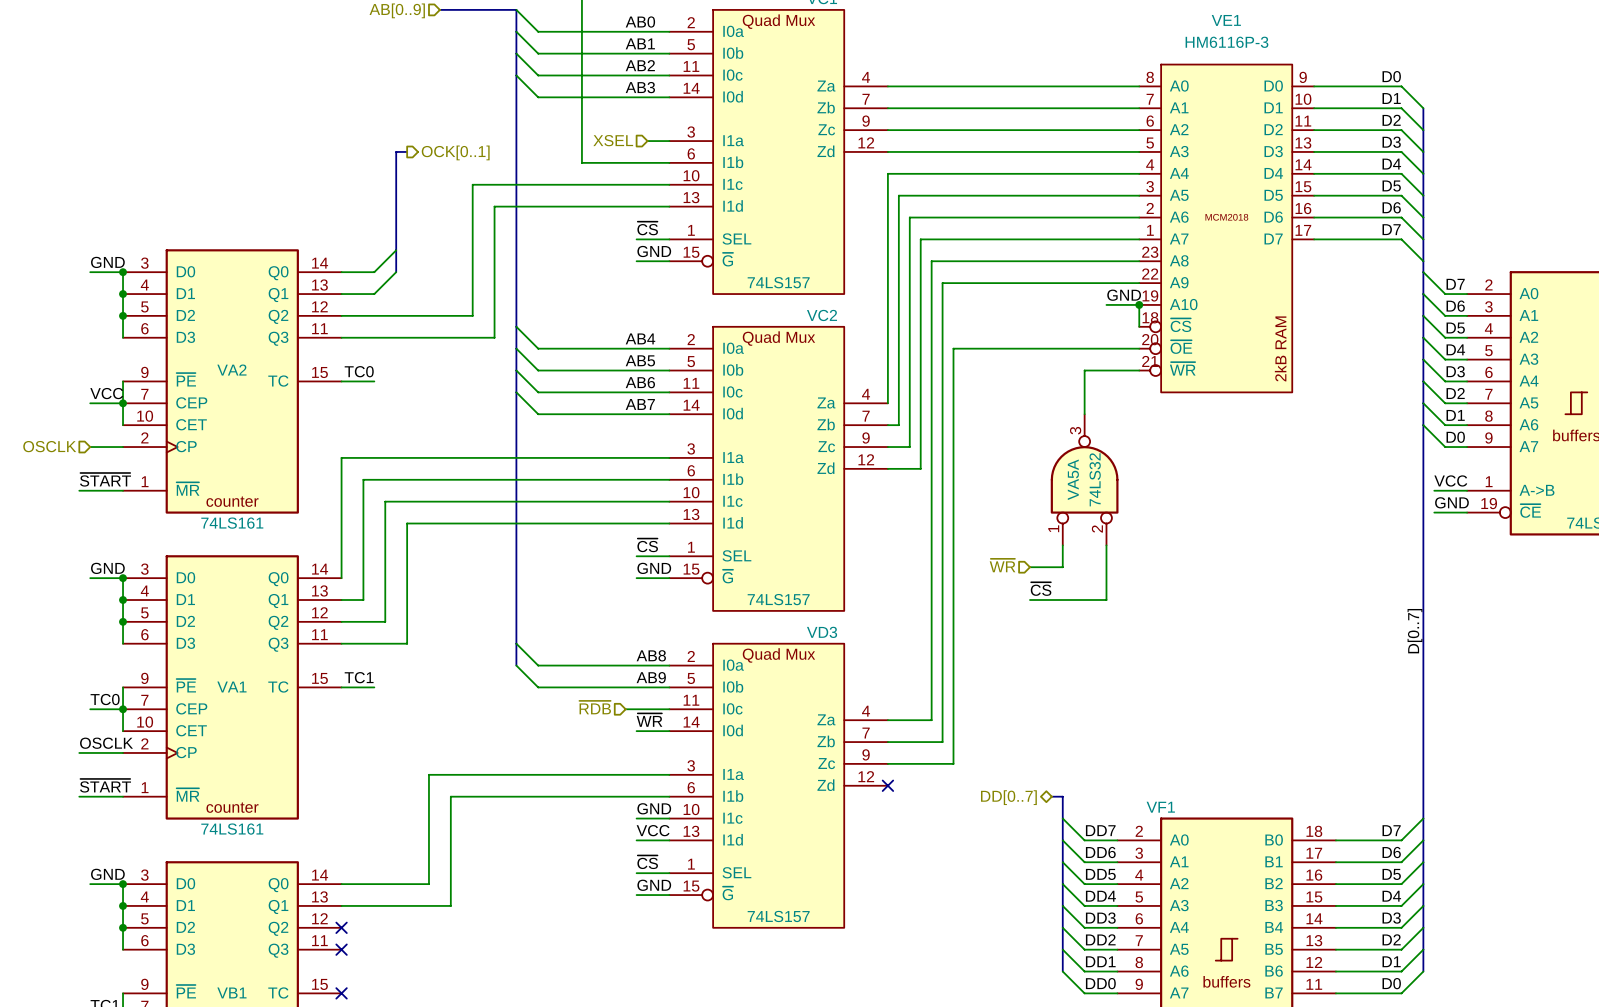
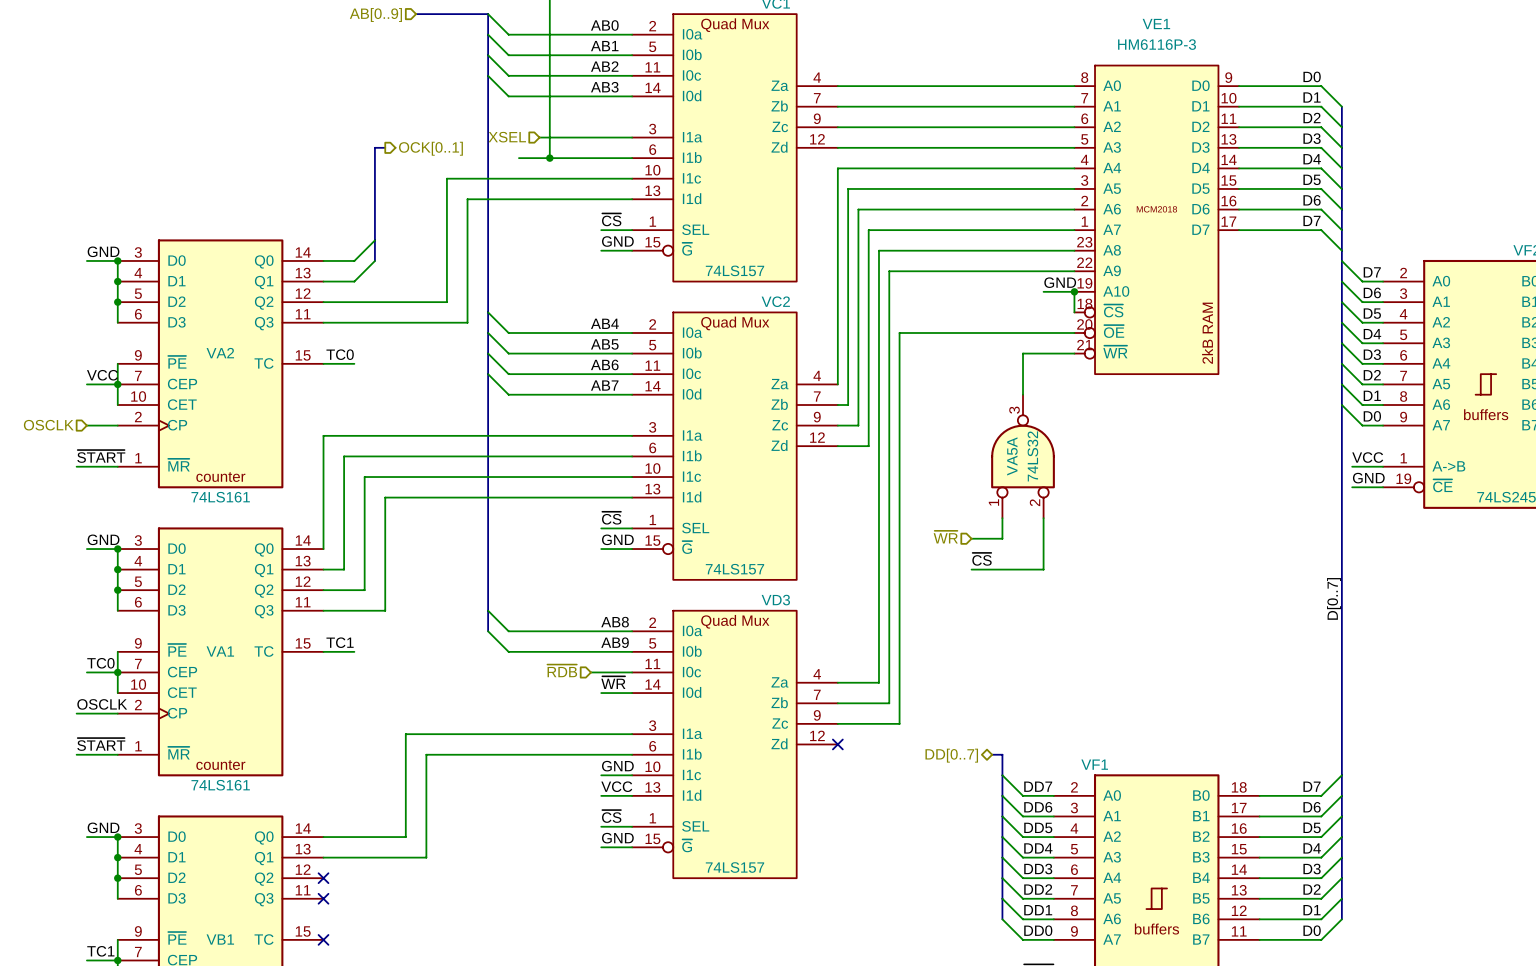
hierarchical label position: XSEL (613, 140) -> XSEL (507, 137)
wire: none -> (539, 137) (611, 137)
wire: none -> (518, 158) (549, 158)
junction: none -> (549, 158)

